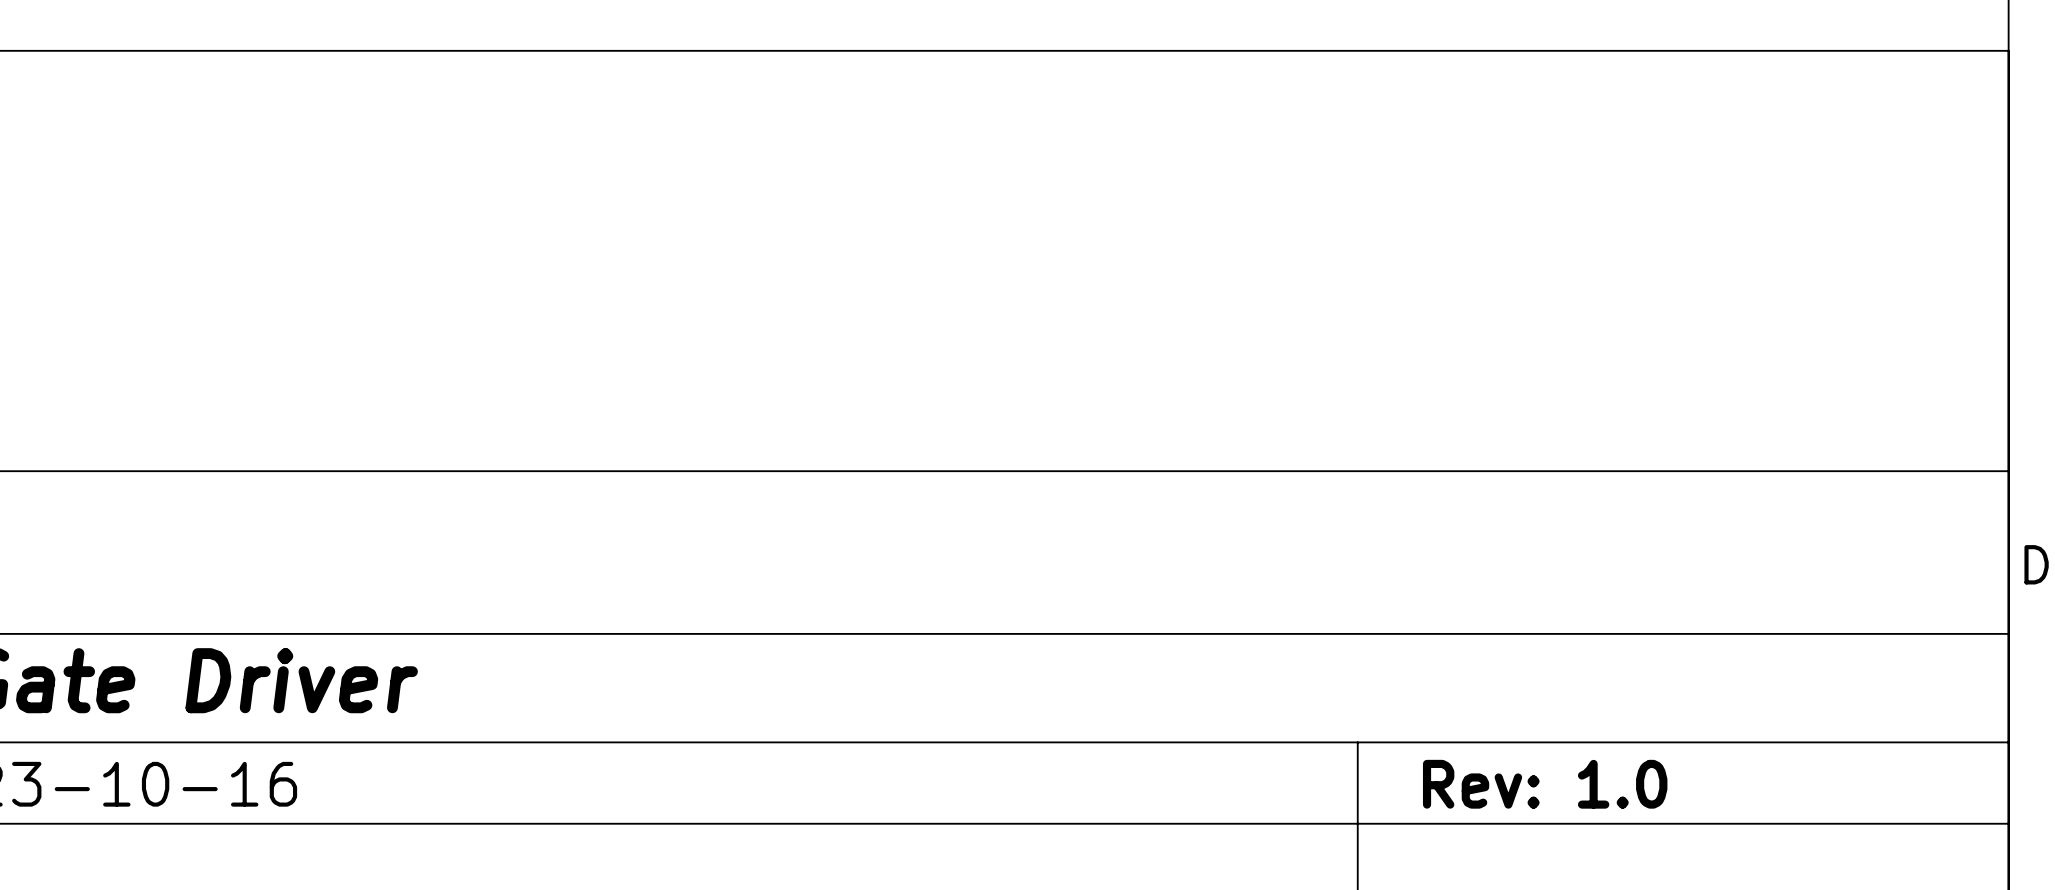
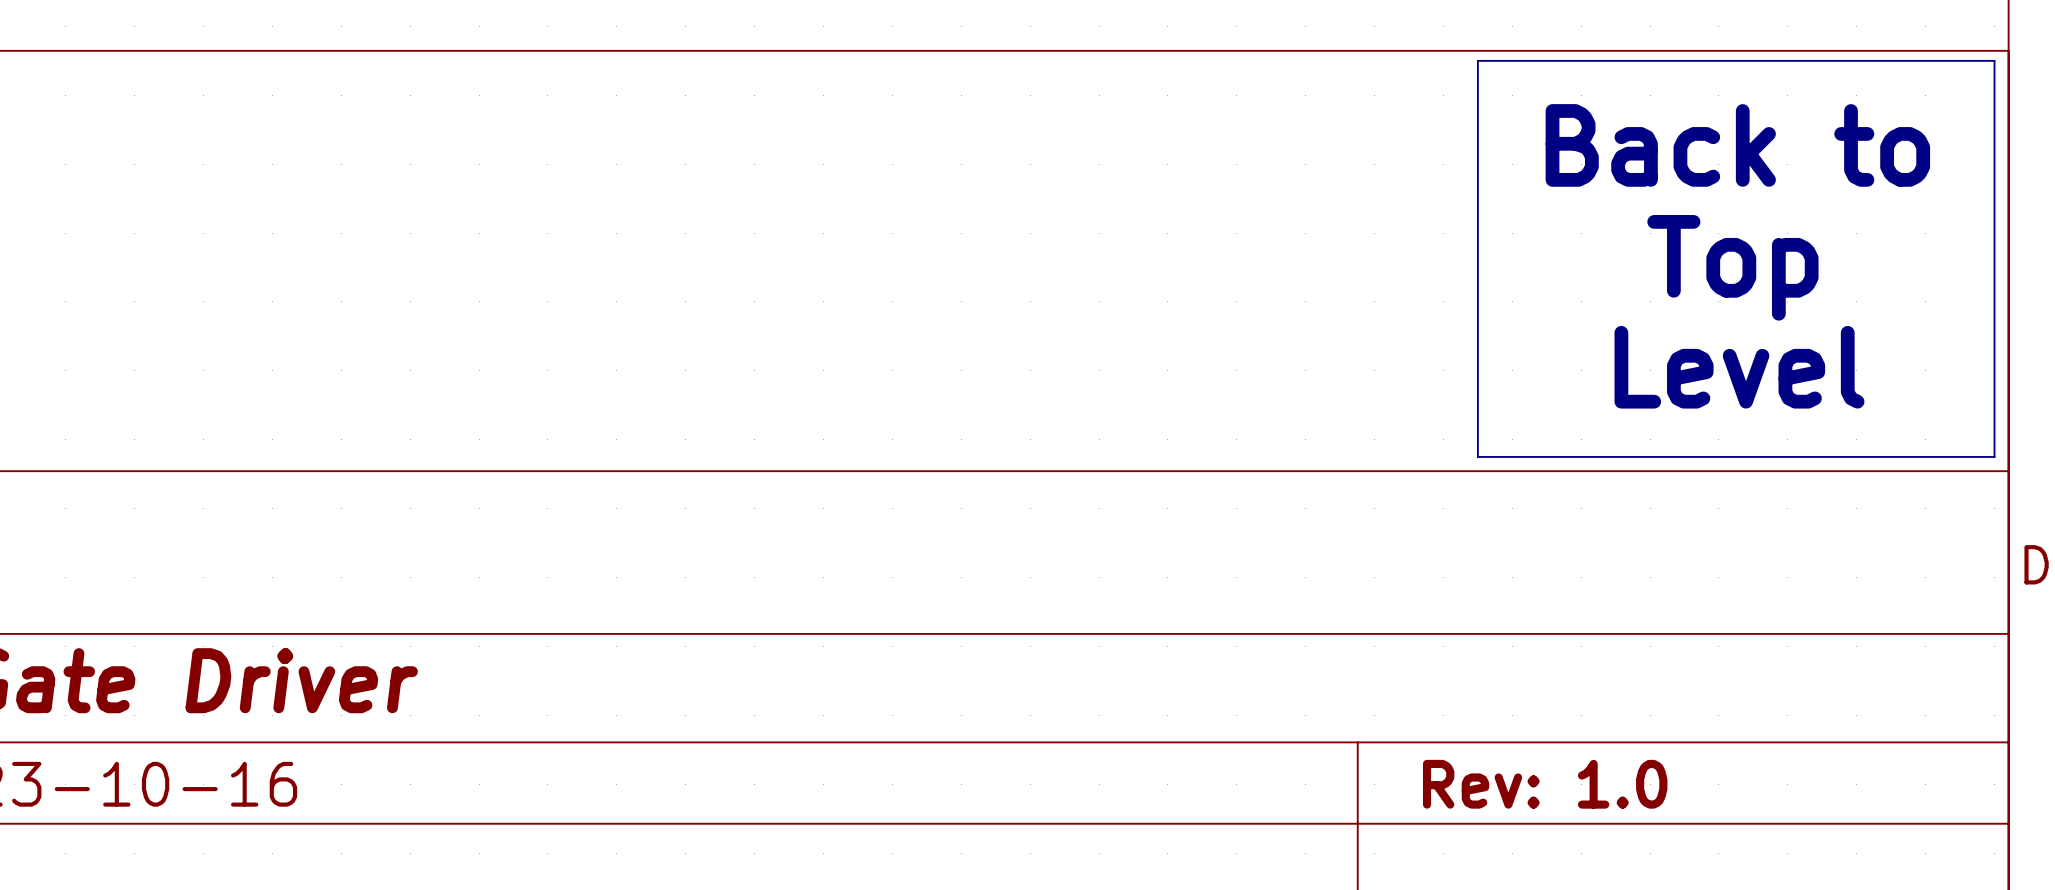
line: none -> (1477, 60) (1994, 60) (1994, 456) (1477, 456) (1477, 60)
text: none -> Back to (1737, 145)
text: none -> Top (1732, 267)
text: none -> Level (1739, 367)

